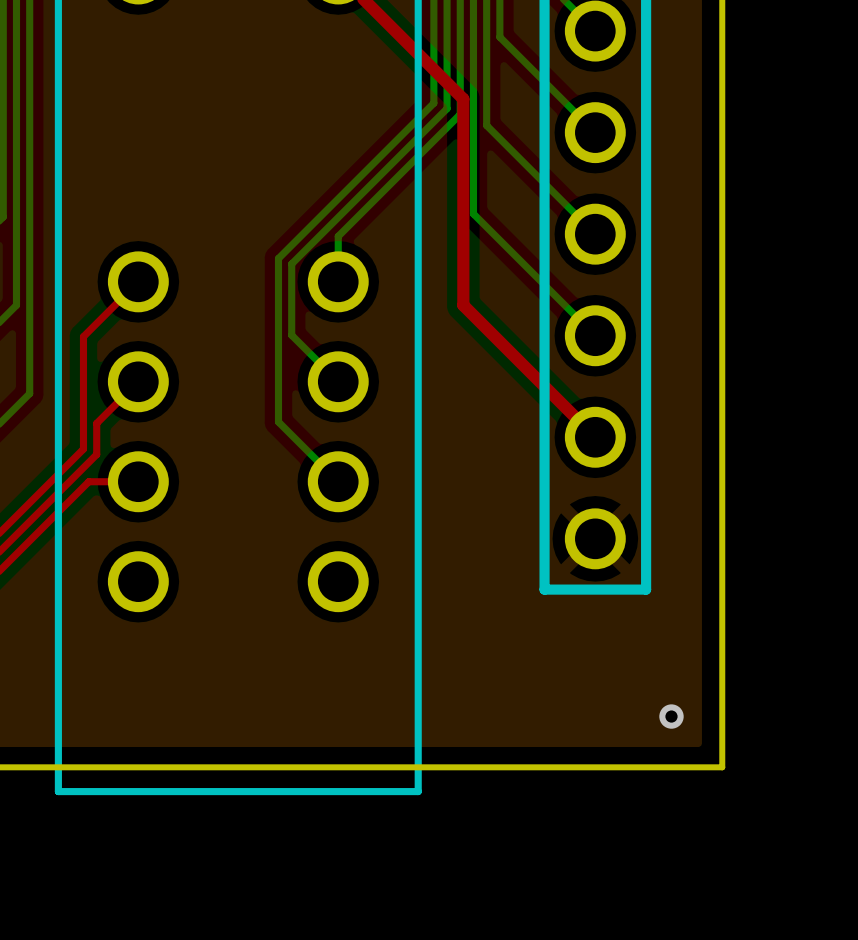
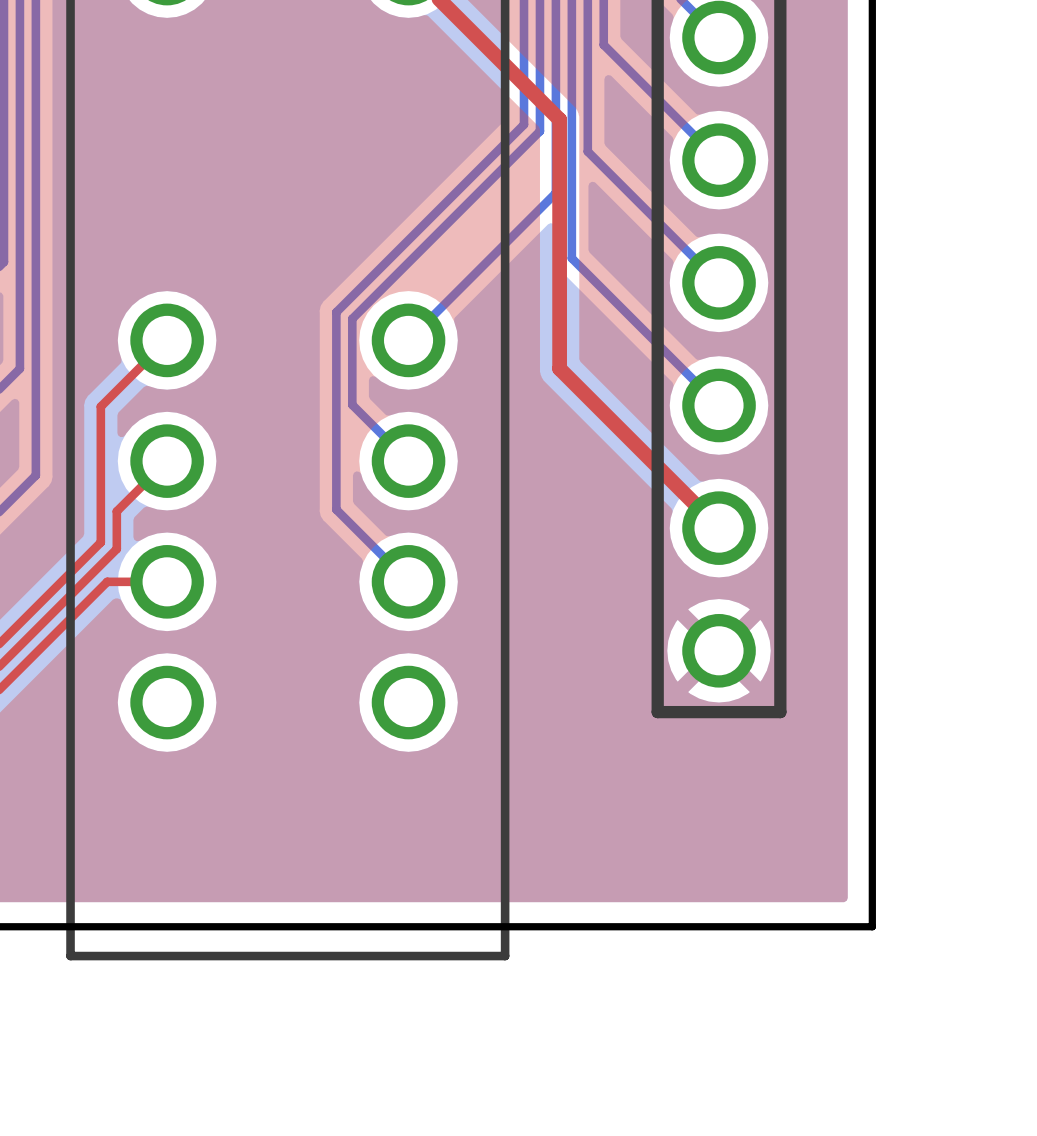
bottom track: (460, 114) (338, 236) (338, 281) -> (555, 138) (555, 193) (408, 340)
via: (671, 716) -> none

